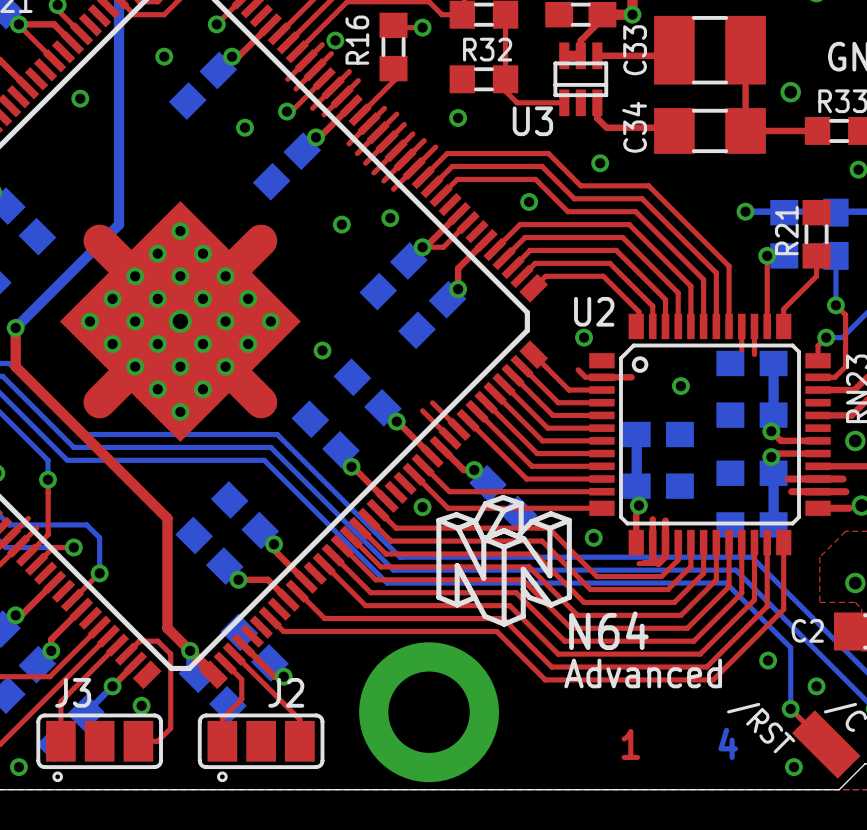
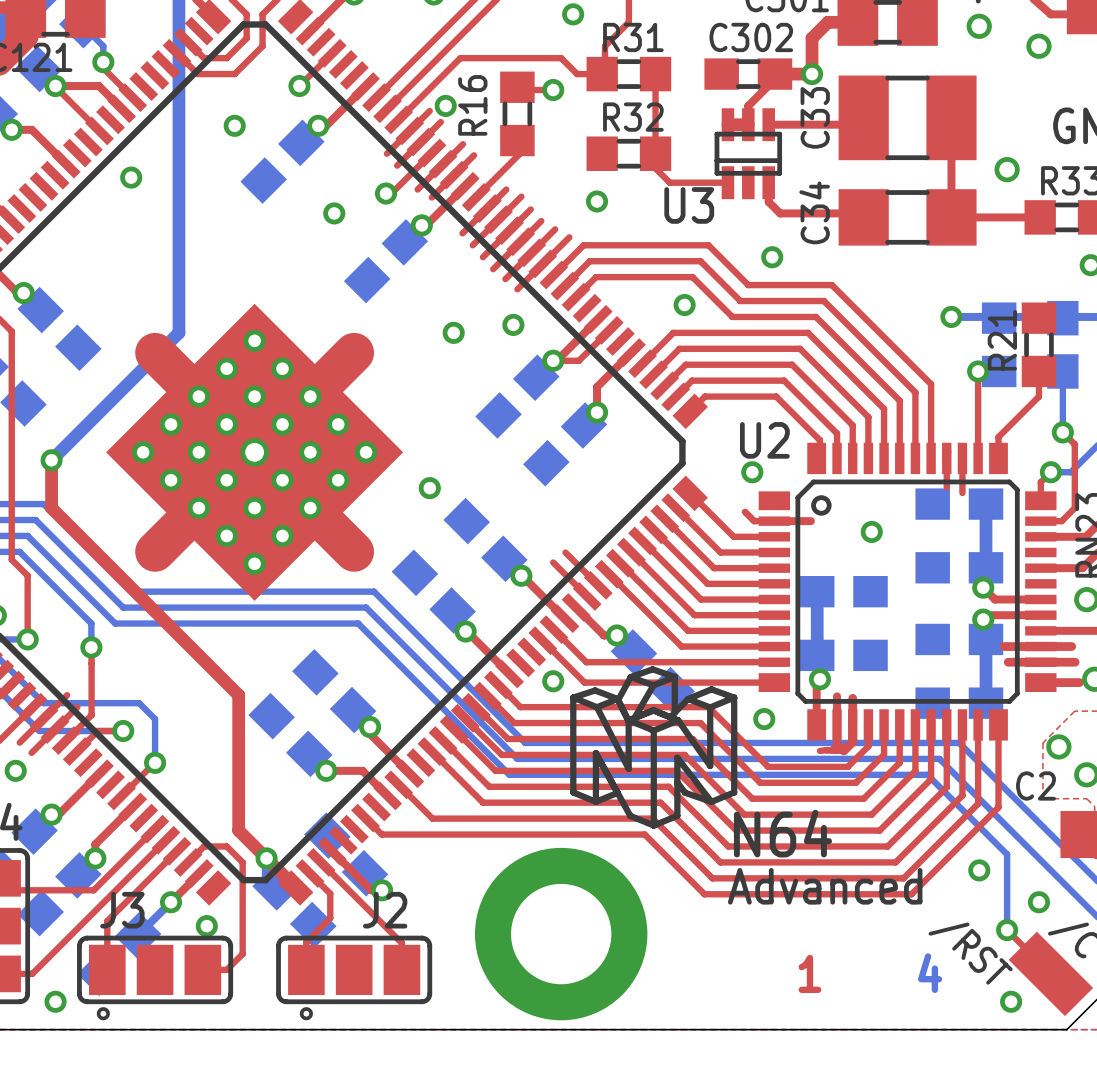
via: none -> (1058, 746)
text position: C2 (807, 630) -> C2 (1036, 785)

